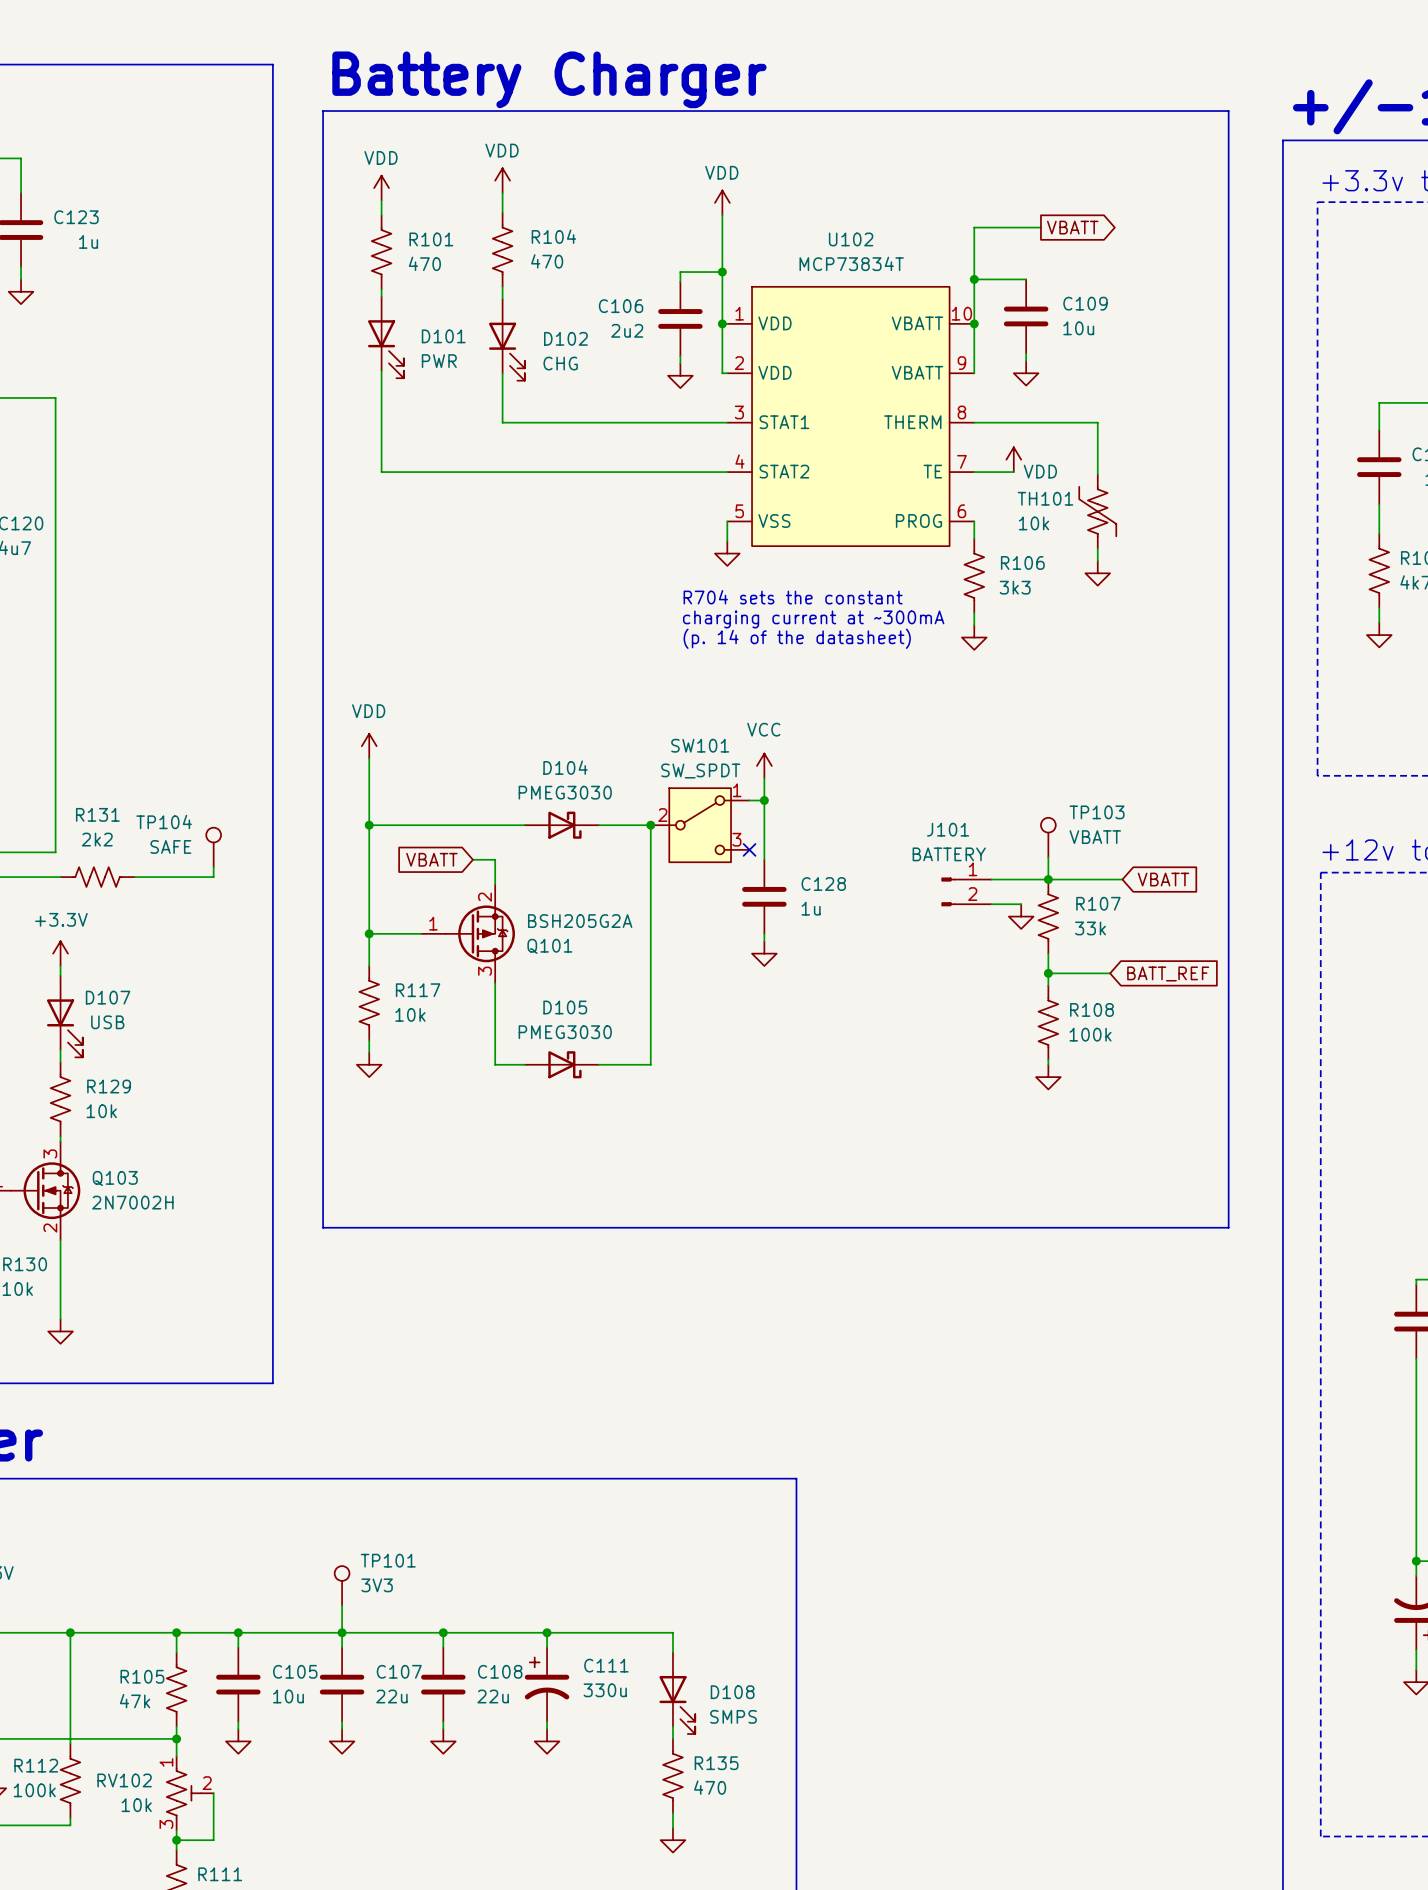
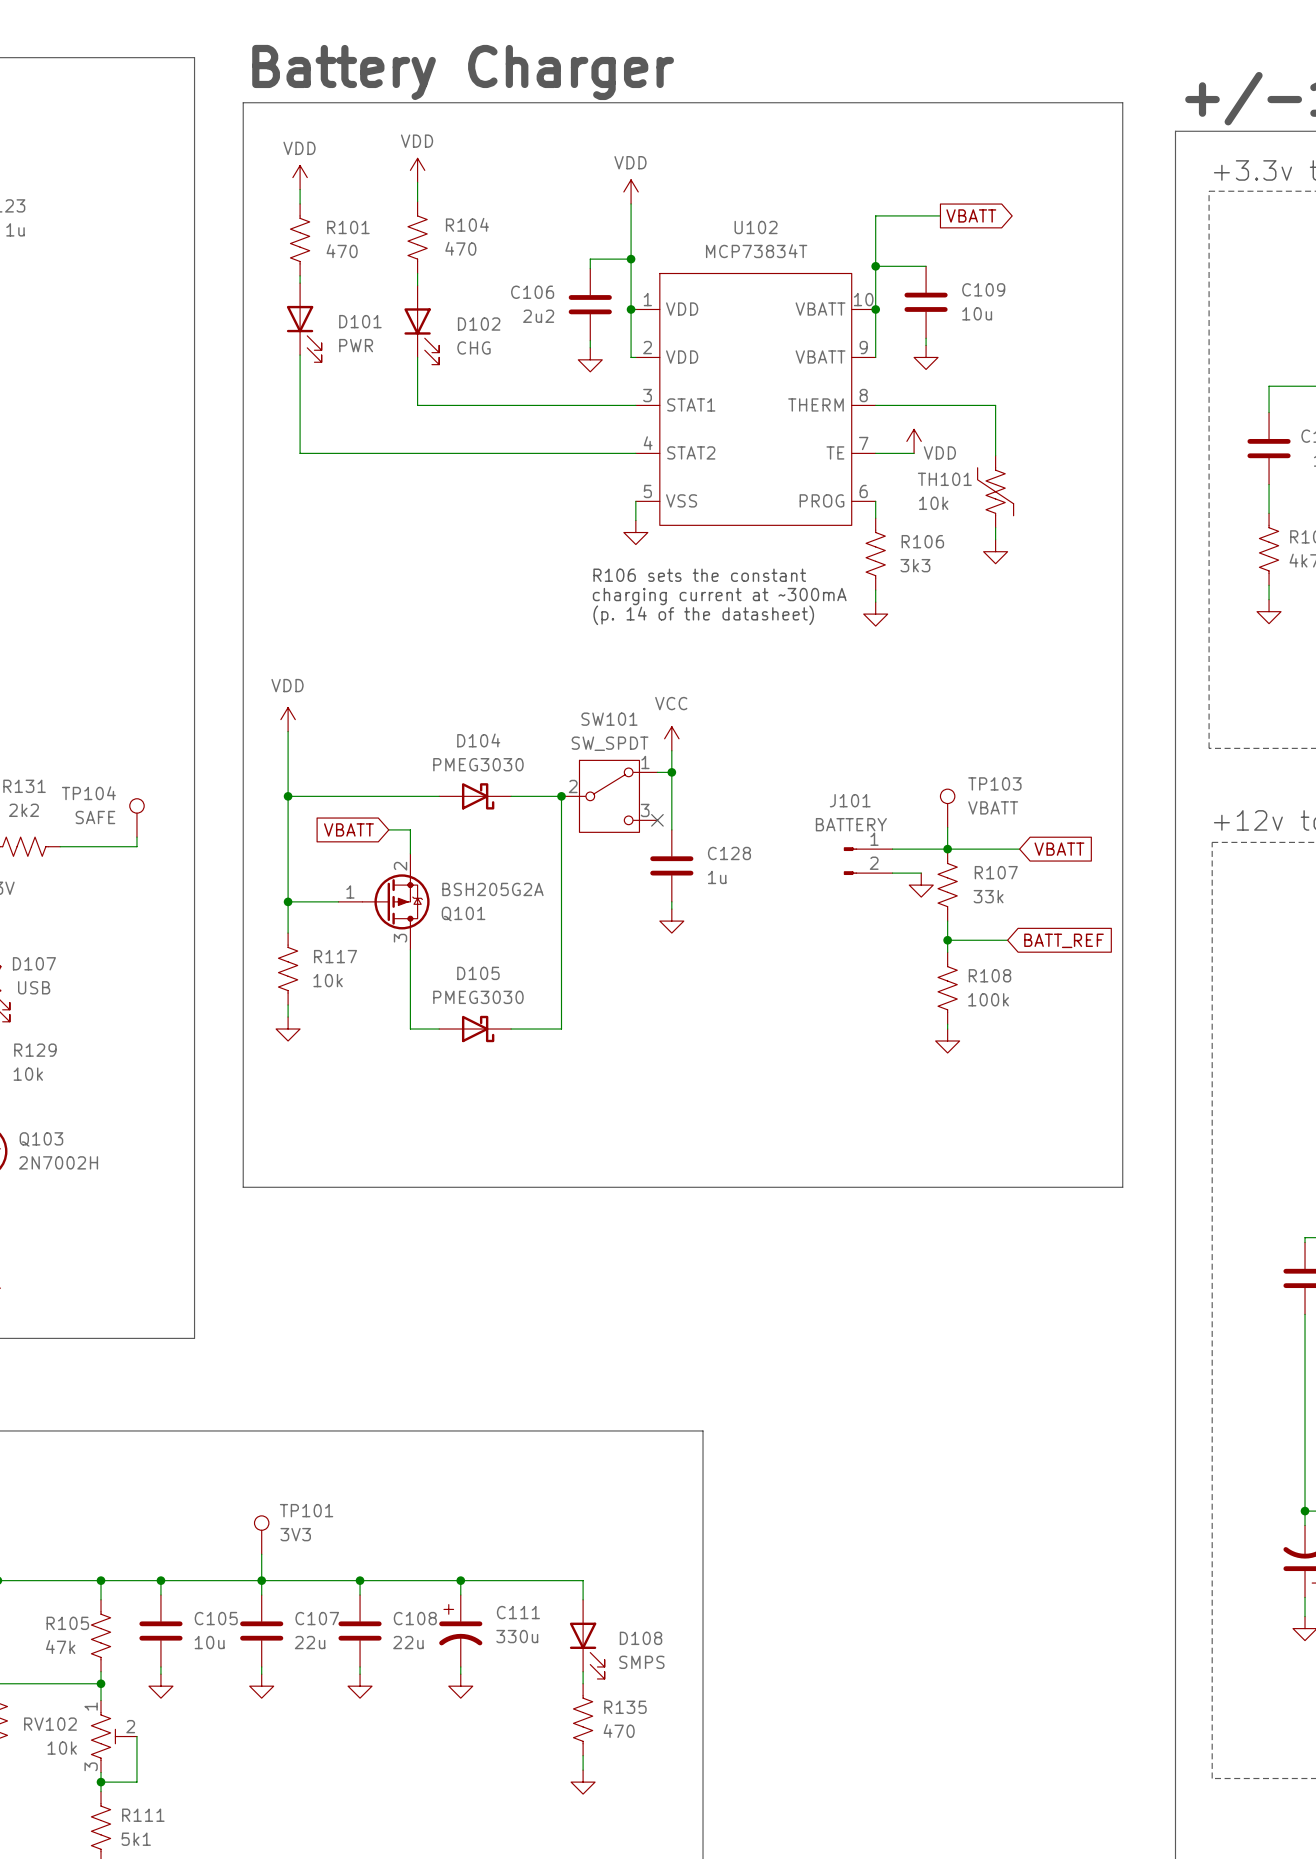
text: R704 sets the constant (793, 597) -> R106 sets the constant (699, 575)

